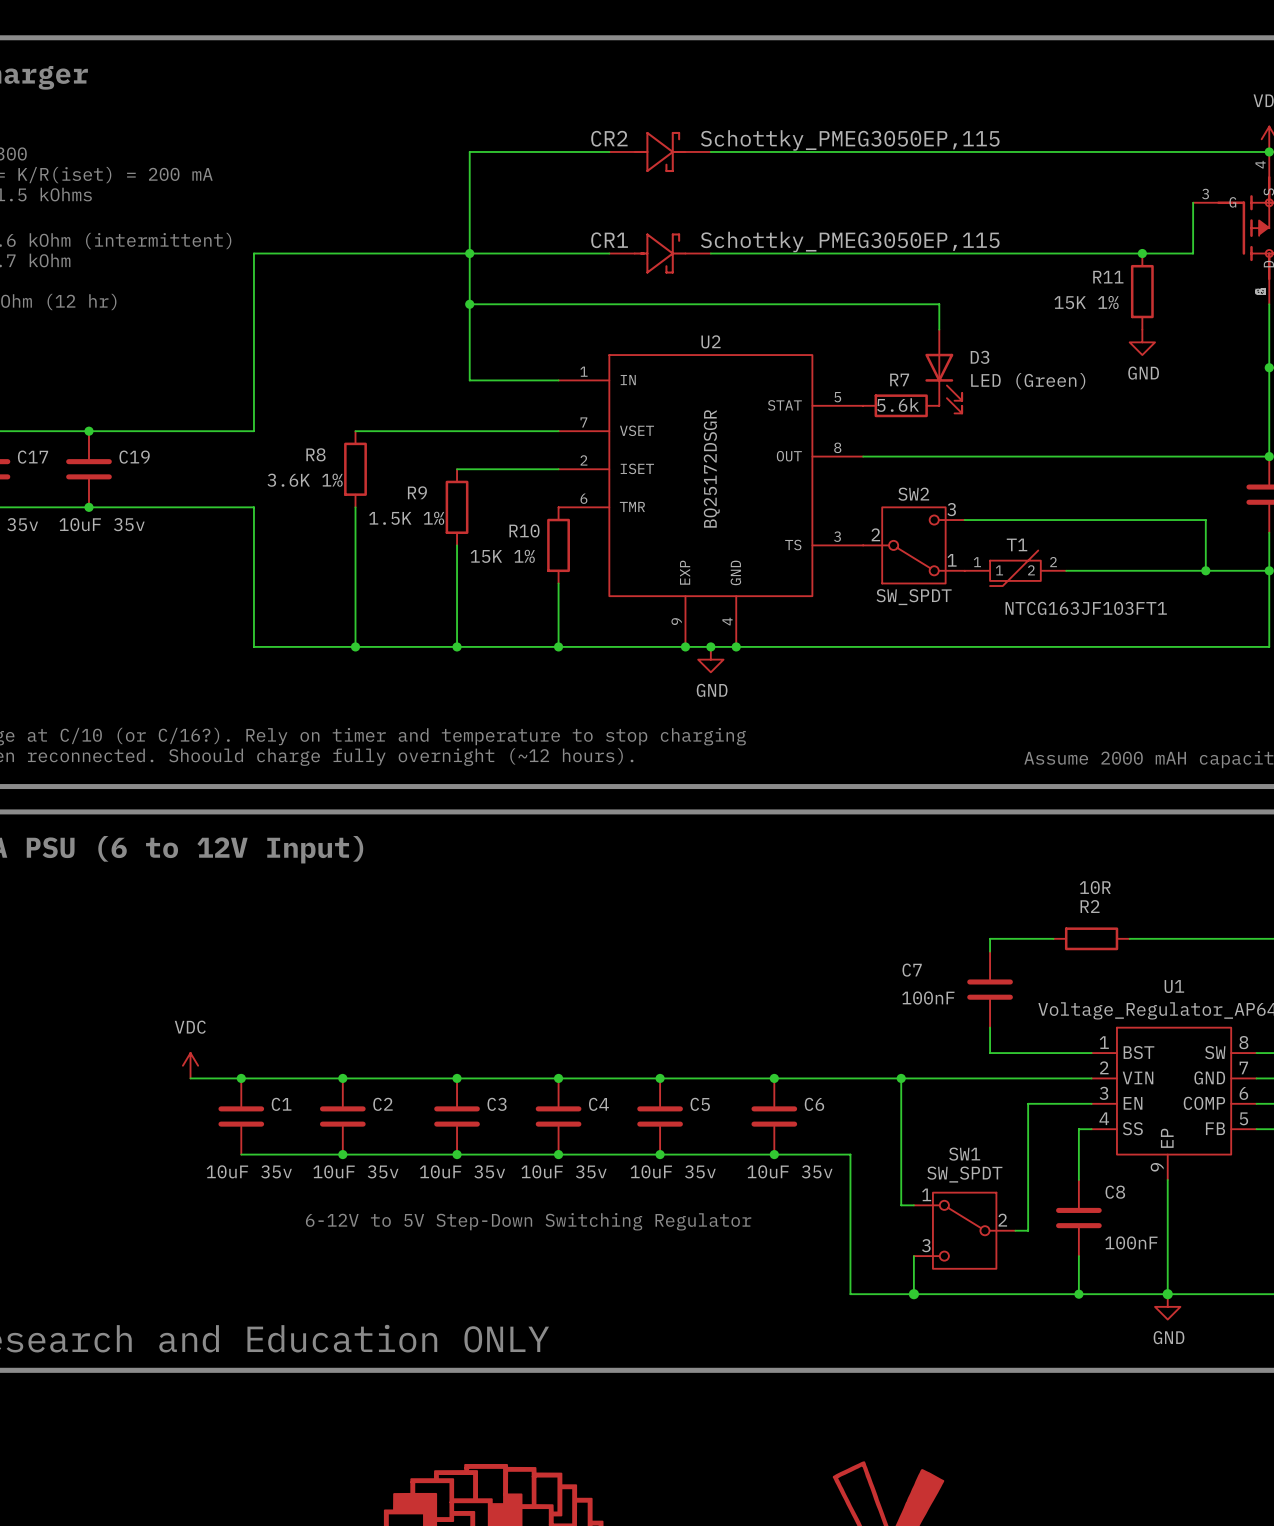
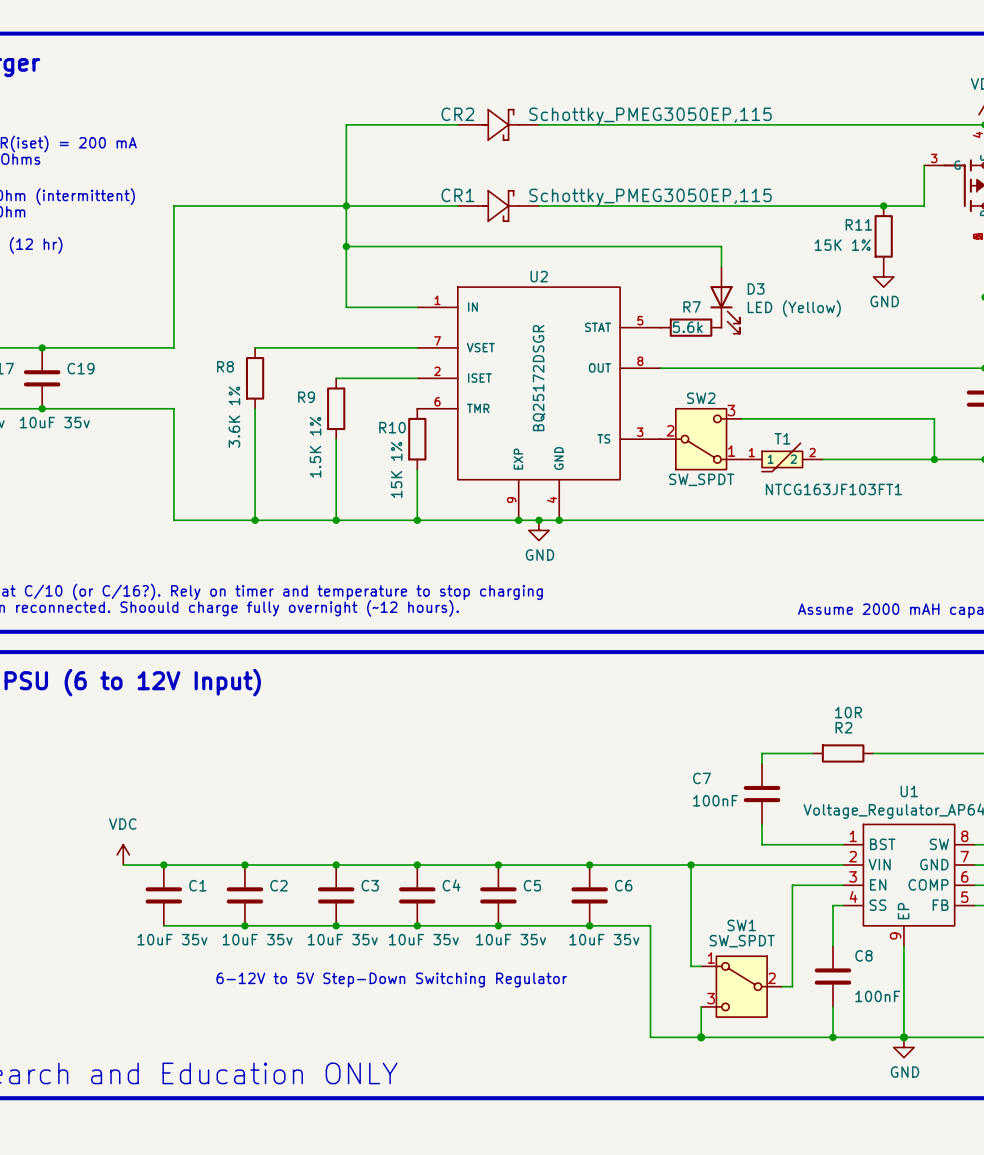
D3 value: LED (Green) (1028, 381) -> LED (Yellow) (794, 308)
R8 value rotation: 0° (305, 480) -> 90° counterclockwise (234, 417)
R9 value rotation: 0° (406, 518) -> 90° counterclockwise (315, 447)
R10 value rotation: 0° (502, 556) -> 90° counterclockwise (396, 470)

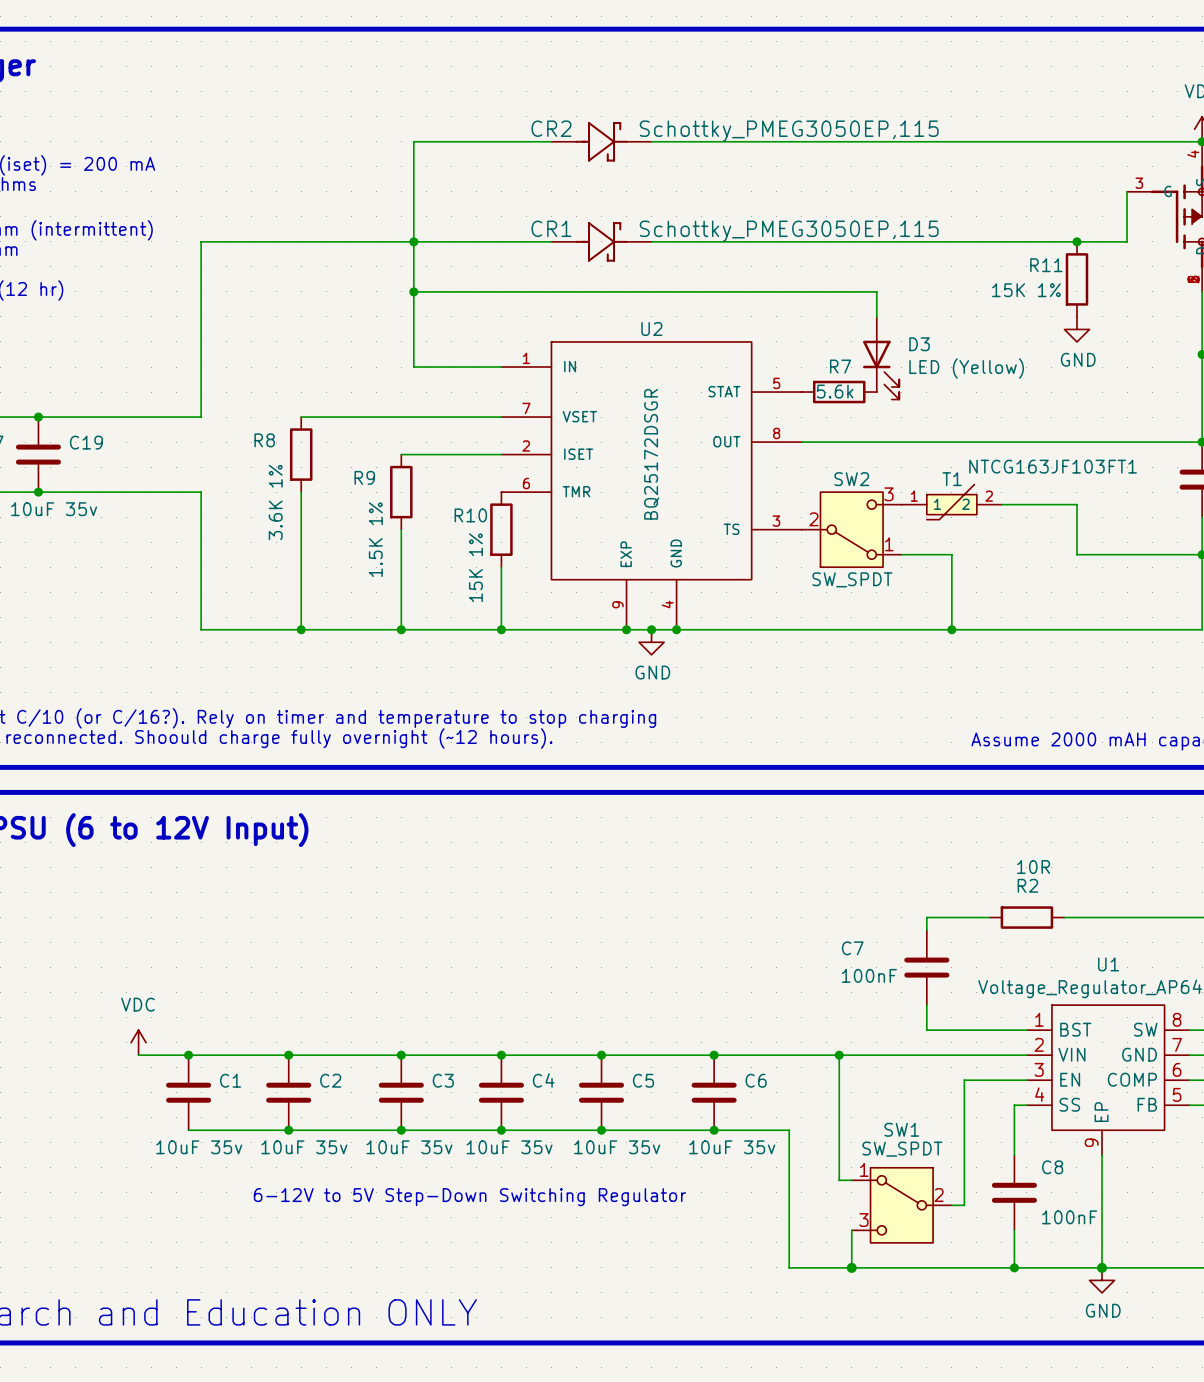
wire: (883, 418) (934, 418) (934, 459) -> (1076, 504) (1076, 554)
T1 position: (782, 457) -> (951, 502)
wire: none -> (901, 554) (951, 554) (951, 629)
wire: (822, 459) (883, 459) -> none
junction: (934, 459) -> none
T1 value position: NTCG163JF103FT1 (833, 489) -> NTCG163JF103FT1 (1053, 466)
junction: none -> (951, 629)

